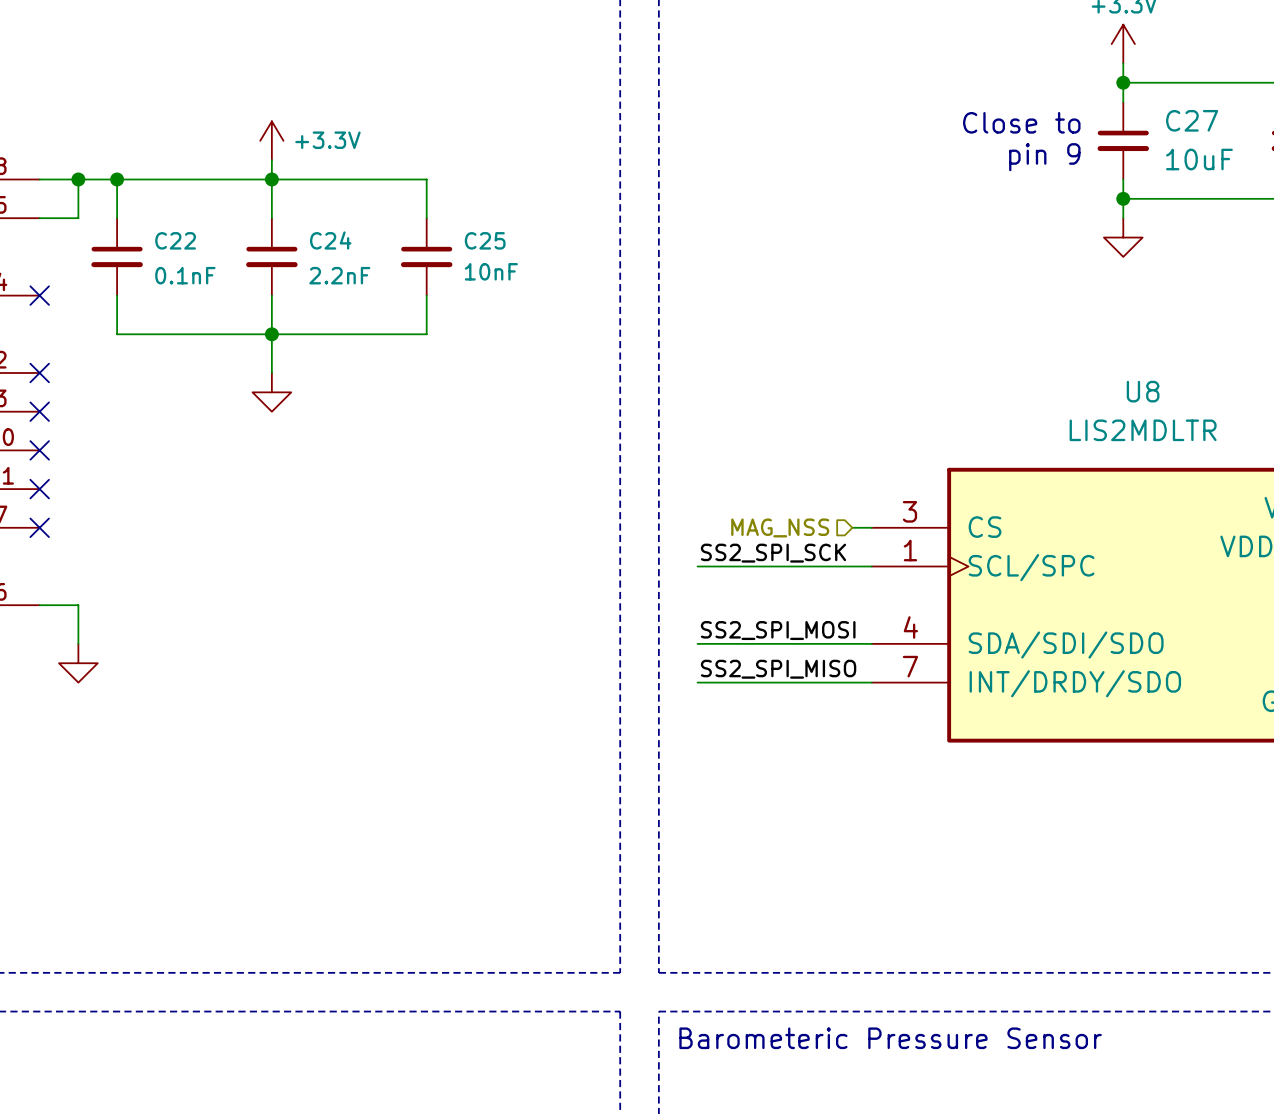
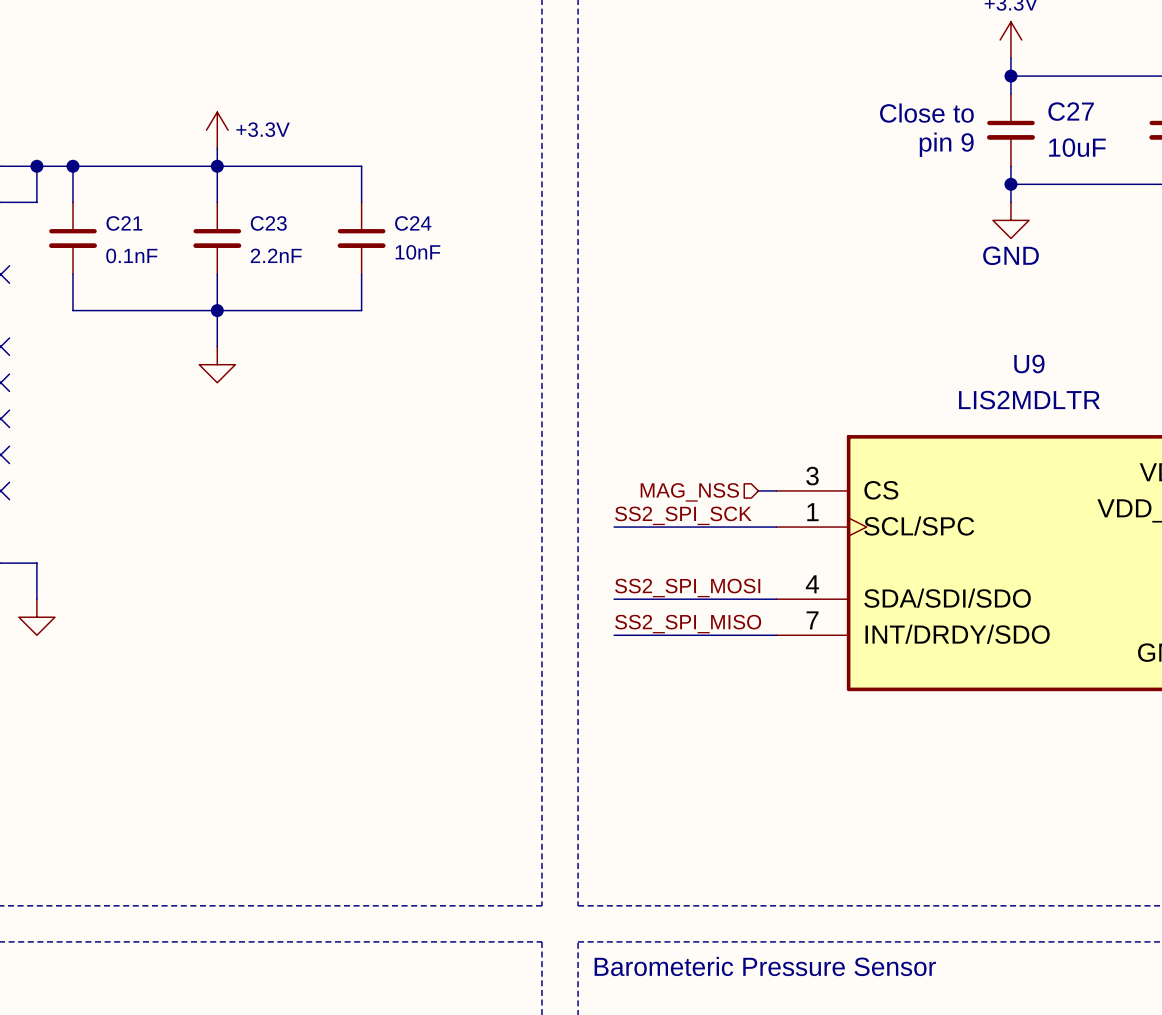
C22 name: C22 (175, 240) -> C21 (124, 223)
C24 name: C24 (330, 240) -> C23 (268, 223)
C25 name: C25 (485, 240) -> C24 (413, 223)
power symbol text: none -> GND (1011, 255)
U8 name: U8 (1143, 391) -> U9 (1029, 364)

